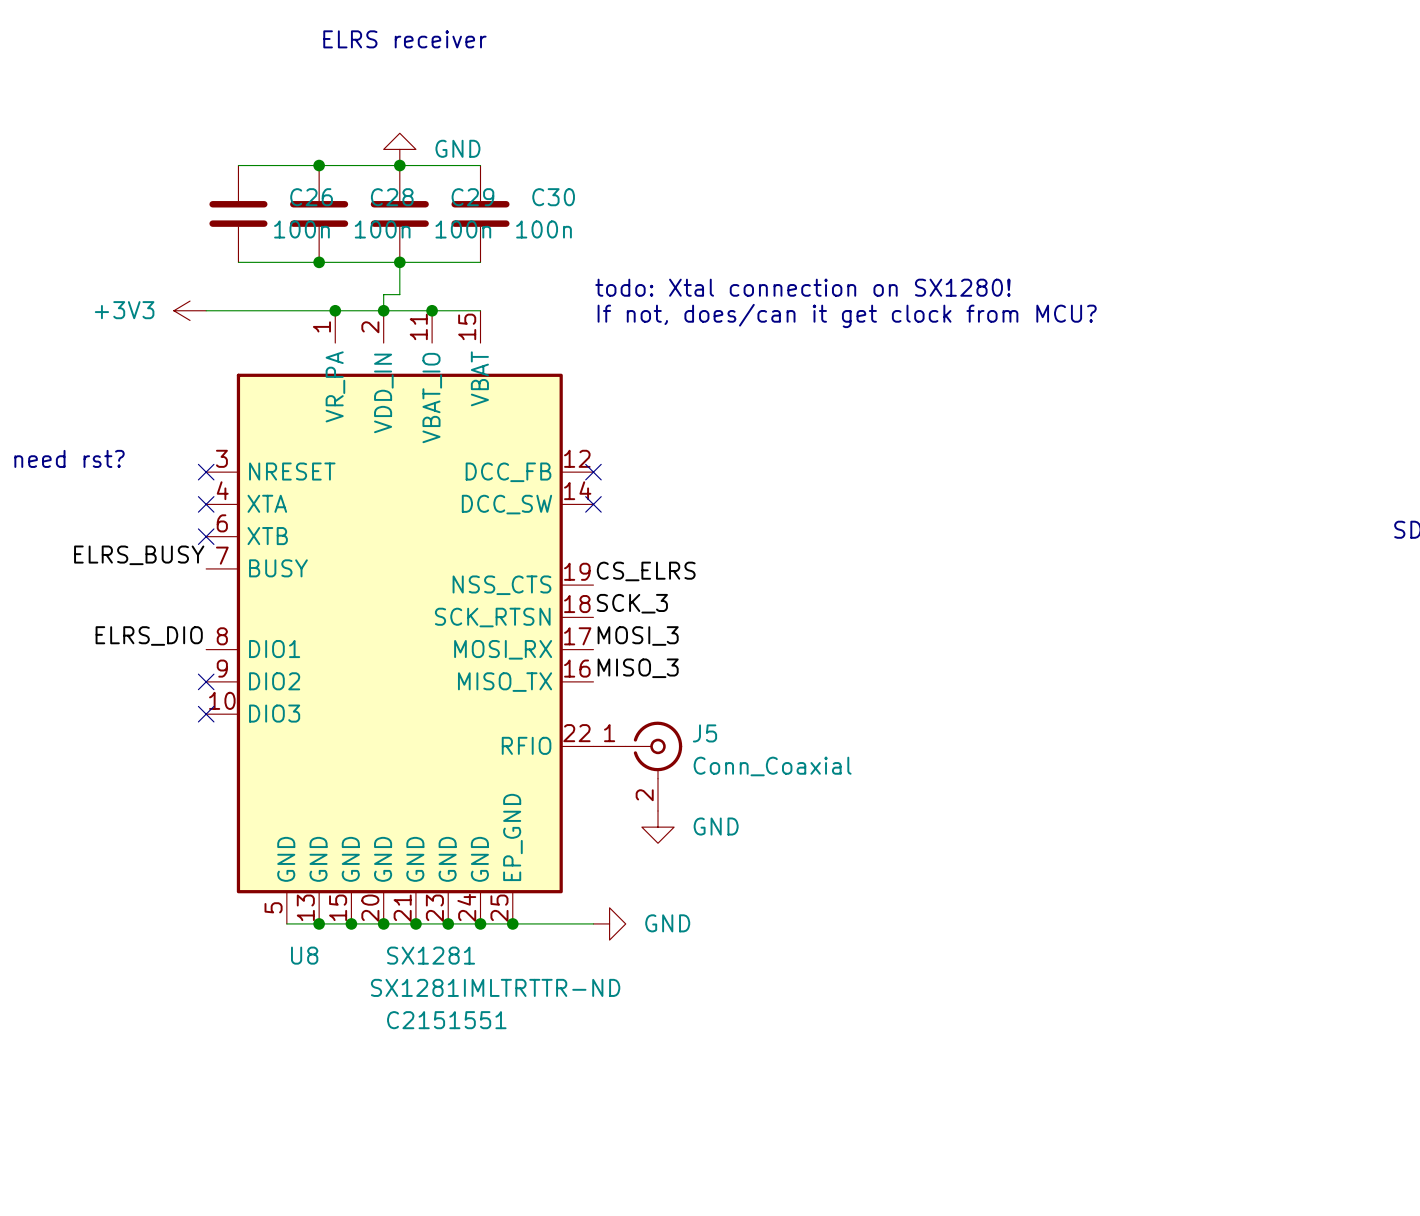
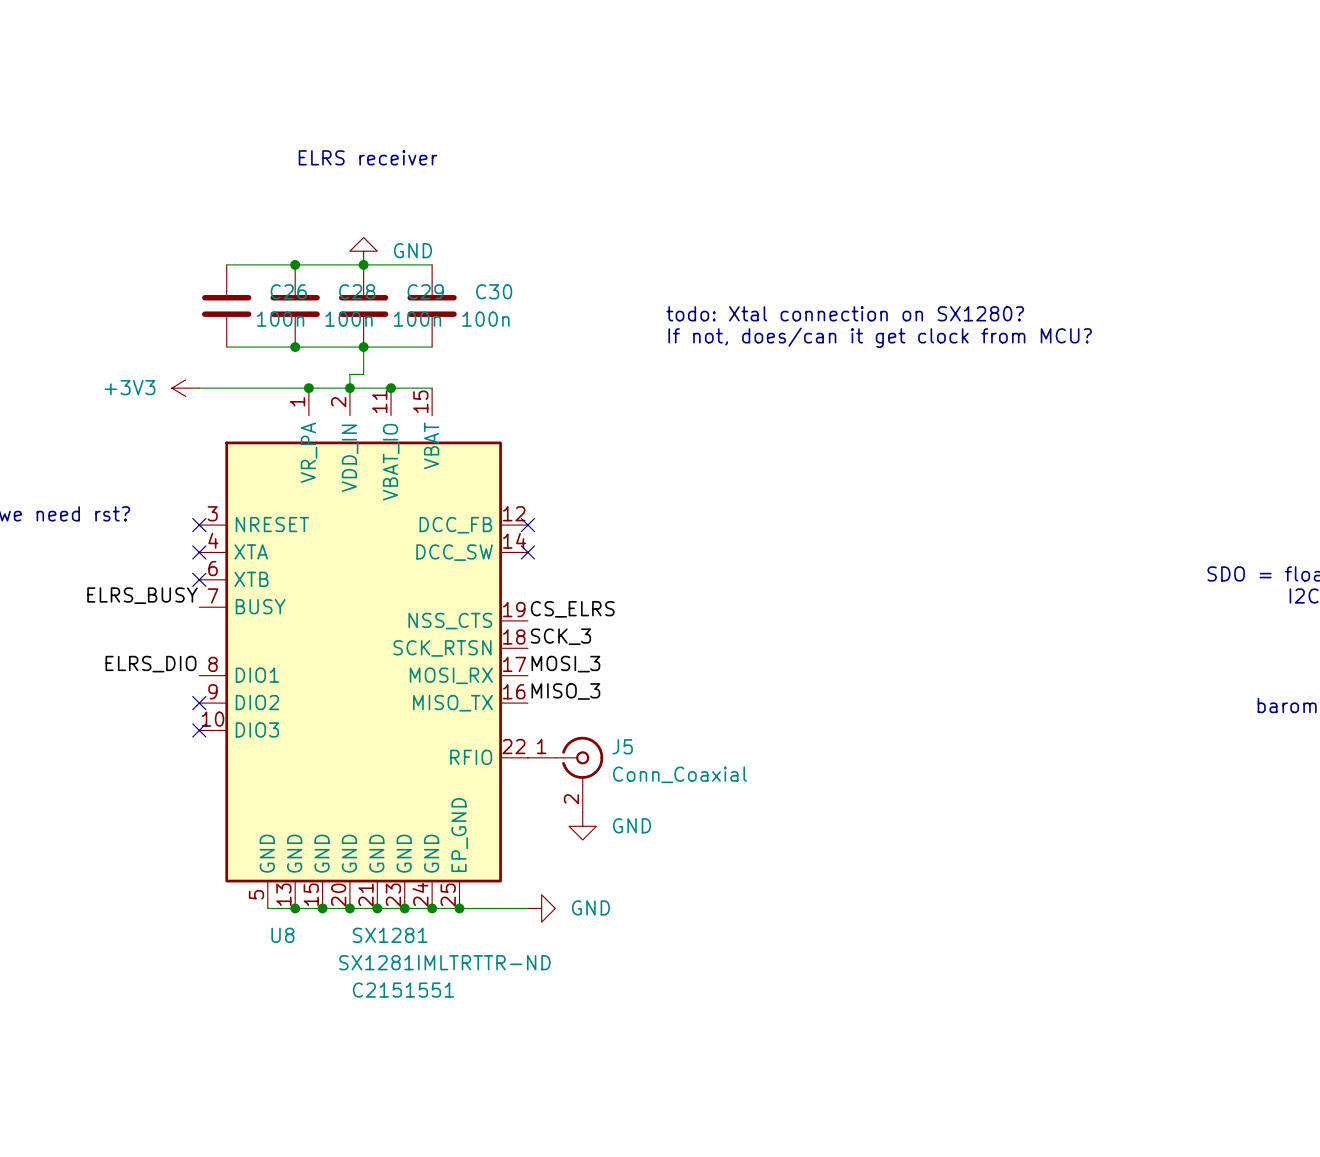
text: none -> todo: Xtal connection on SX1280? (845, 313)
text: todo: Xtal connection on SX1280! (802, 287) -> none
text position: If not, does/can it get clock from MCU? (847, 315) -> If not, does/can it get clock from MCU? (880, 337)

